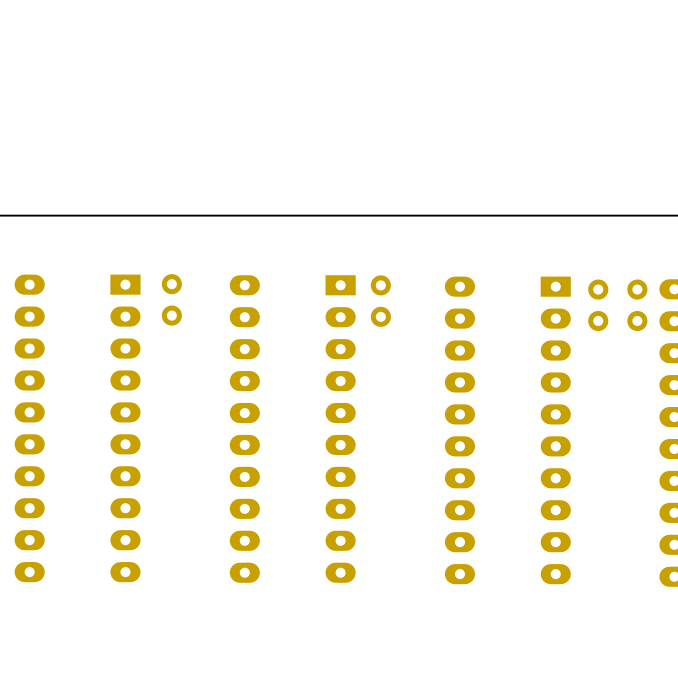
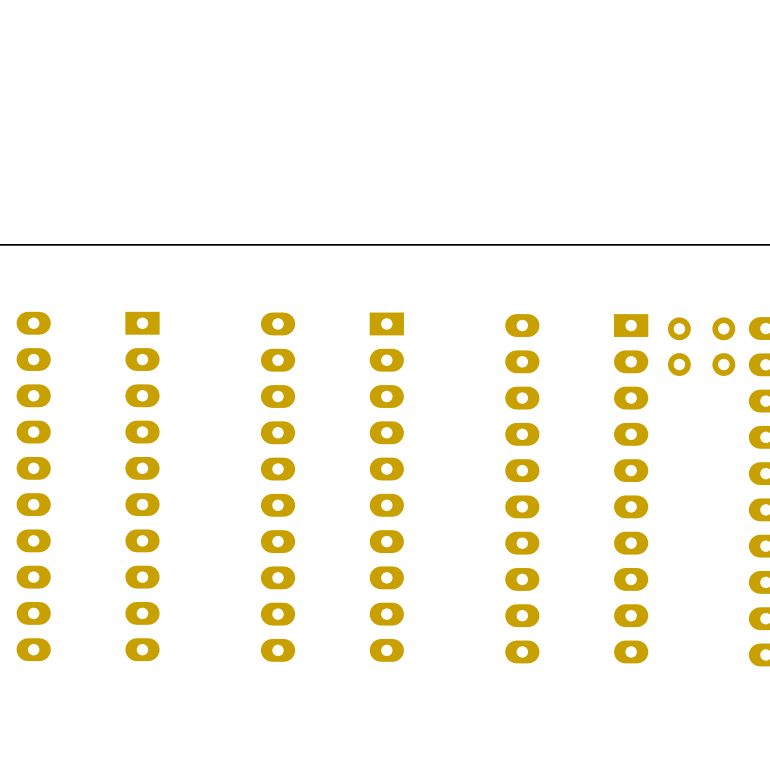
part: (171, 299) -> none
part: (380, 301) -> none

